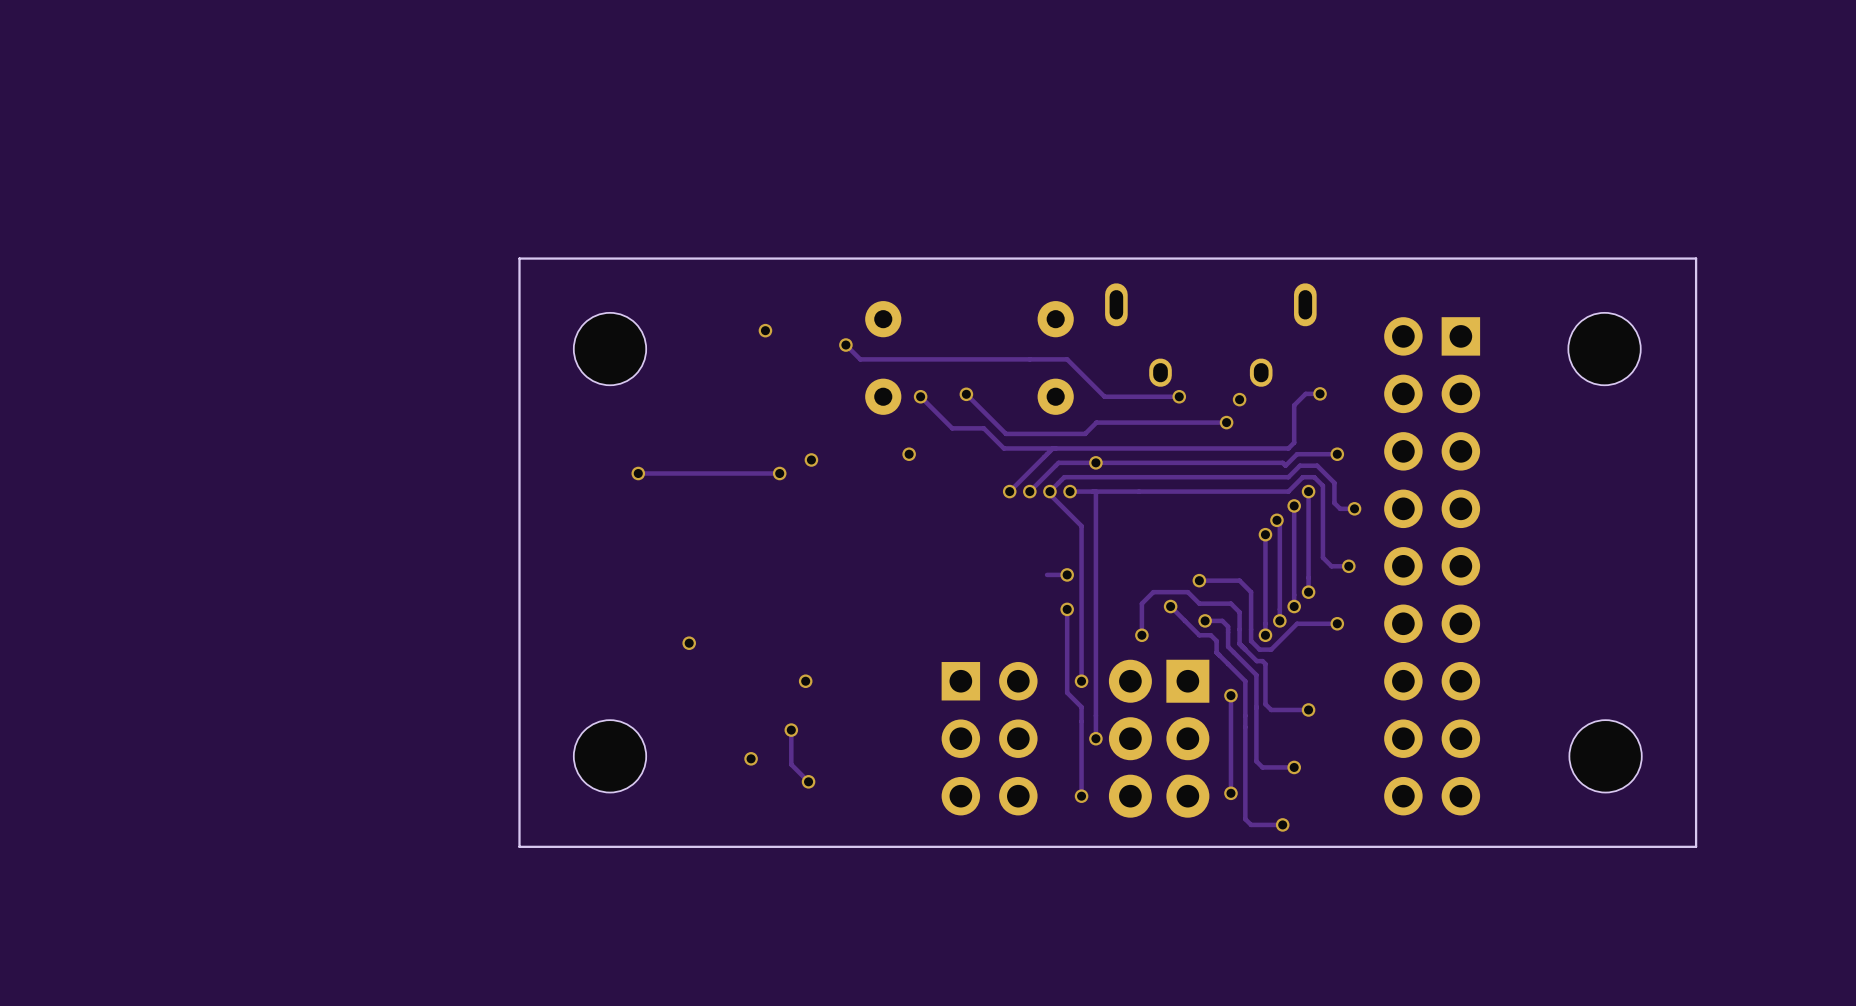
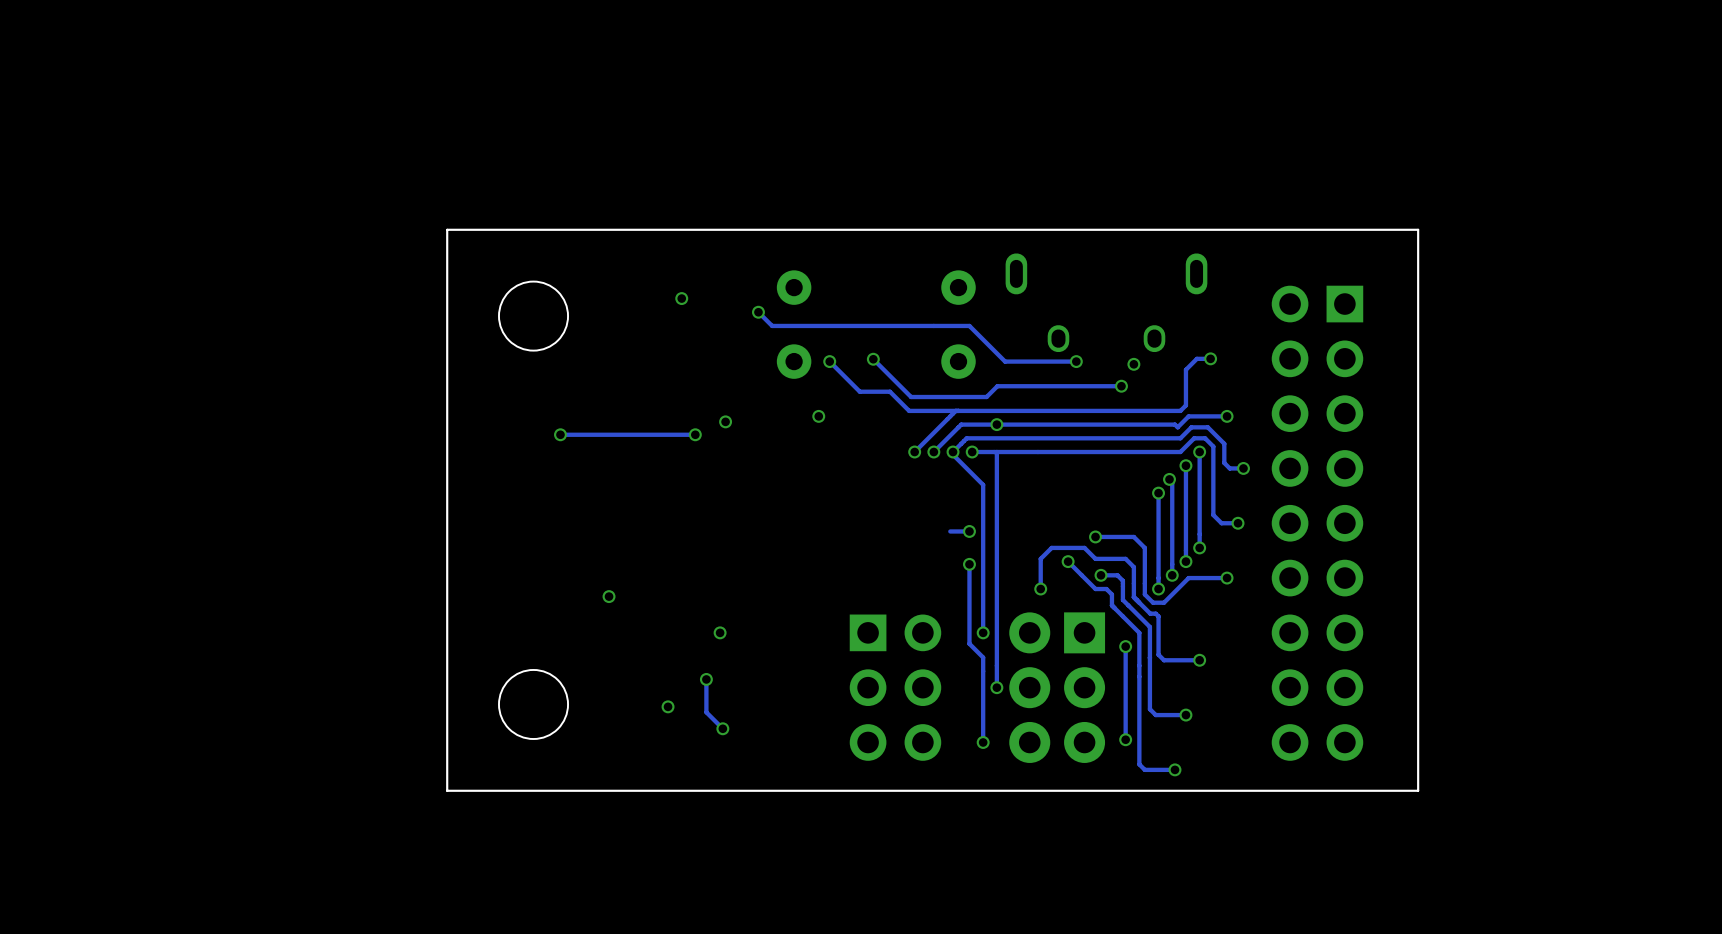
board edge: (1537, 258) (1696, 258) (1696, 846) (1537, 846) -> (1418, 229) (1418, 790)
part: (1604, 349) -> none
part: (1605, 756) -> none

